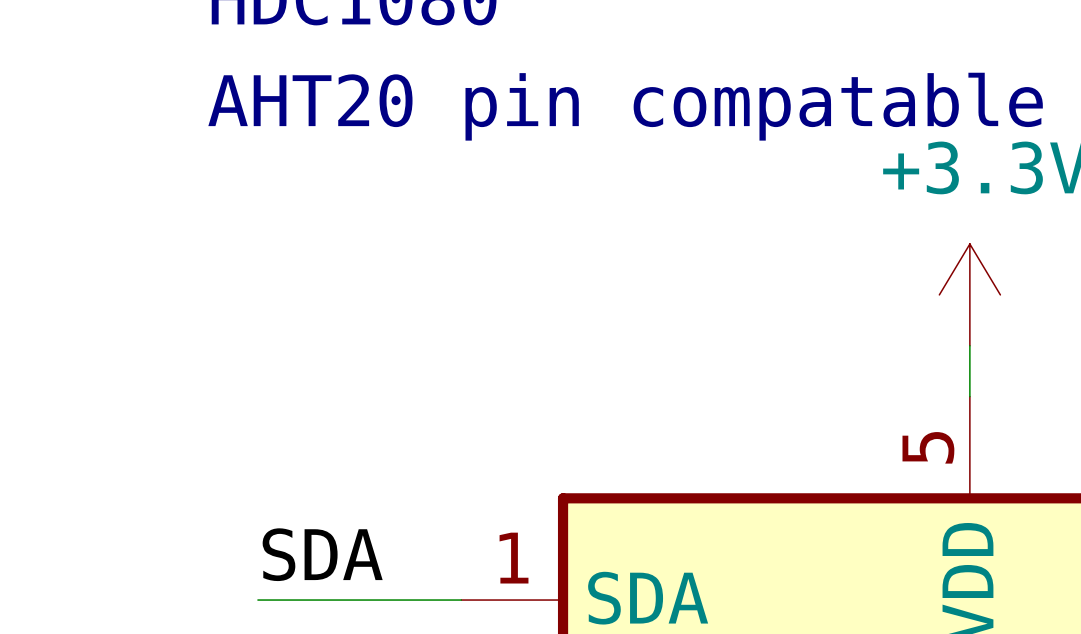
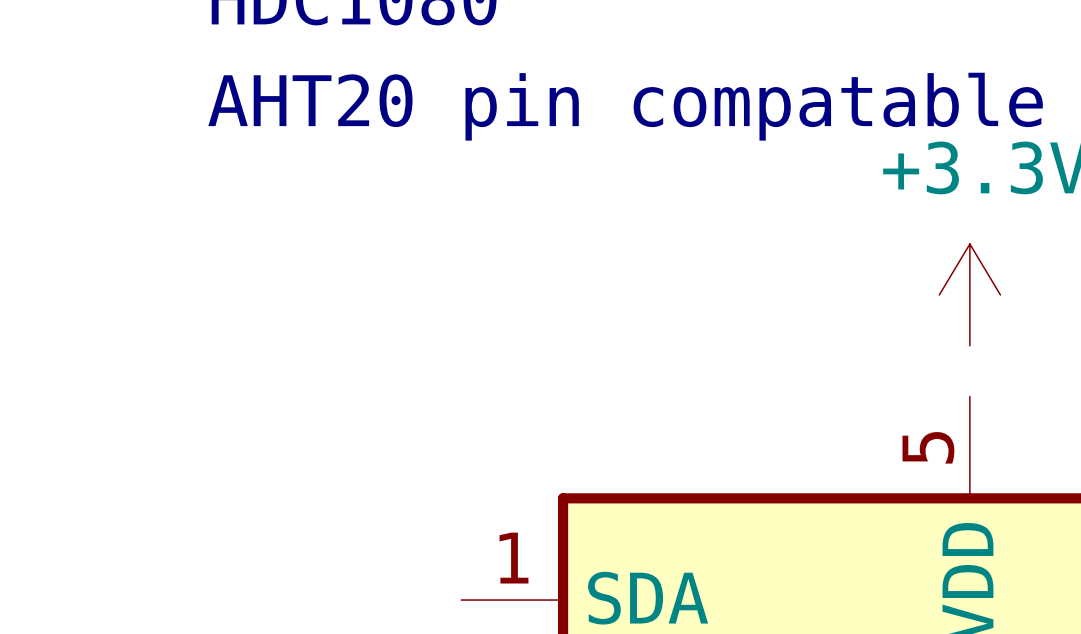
wire: (969, 345) (969, 396) -> none
label: SDA (322, 554) -> none
wire: (257, 600) (461, 600) -> none

